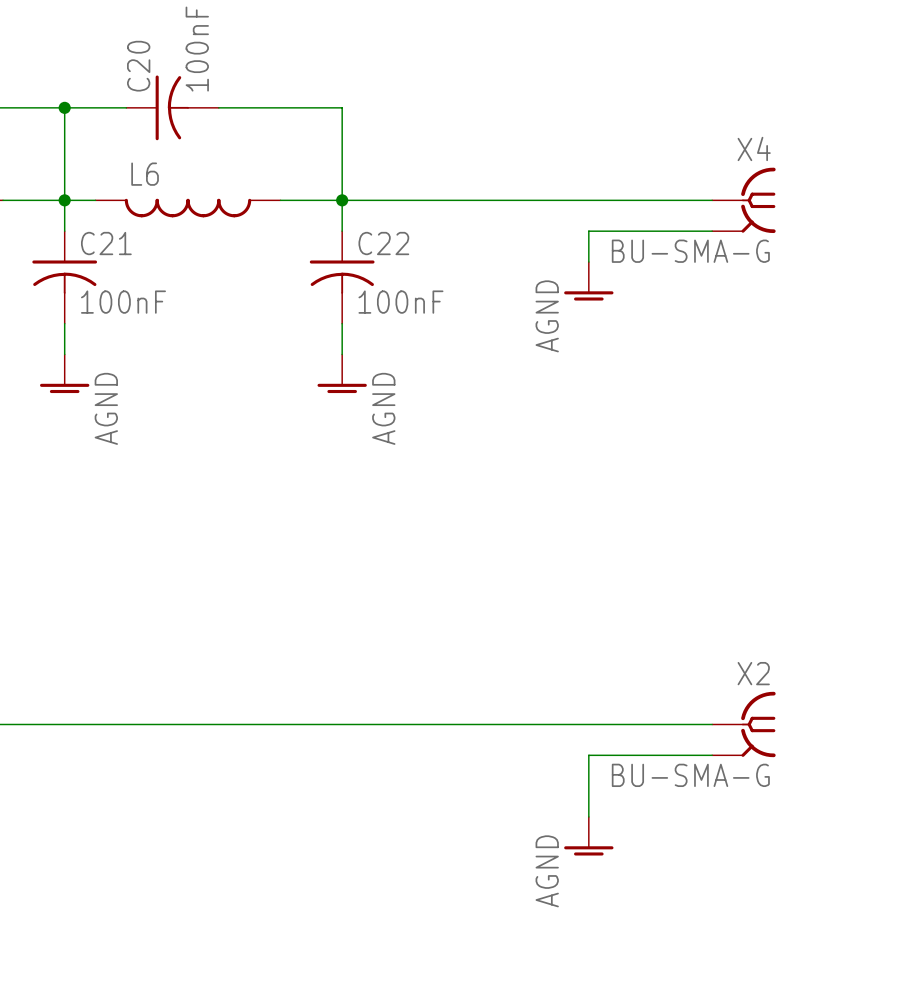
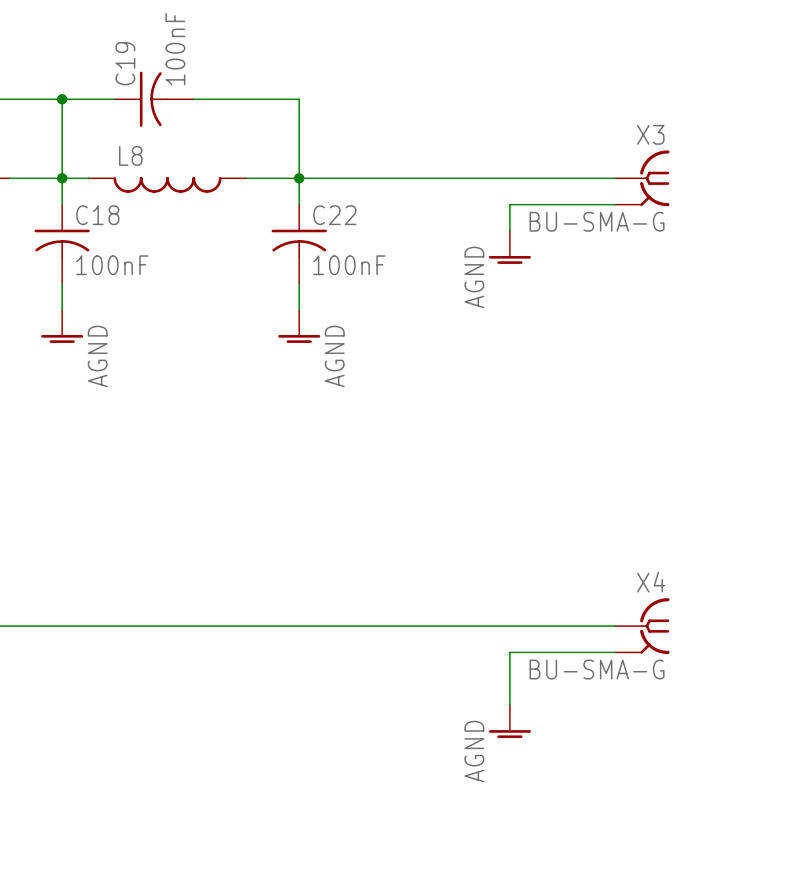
C20 name: C20 (138, 66) -> C19 (125, 63)
X4 name: X4 (754, 148) -> X3 (650, 134)
L6 name: L6 (145, 174) -> L8 (130, 155)
C21 name: C21 (106, 243) -> C18 (97, 215)
X2 name: X2 (753, 673) -> X4 (651, 582)

